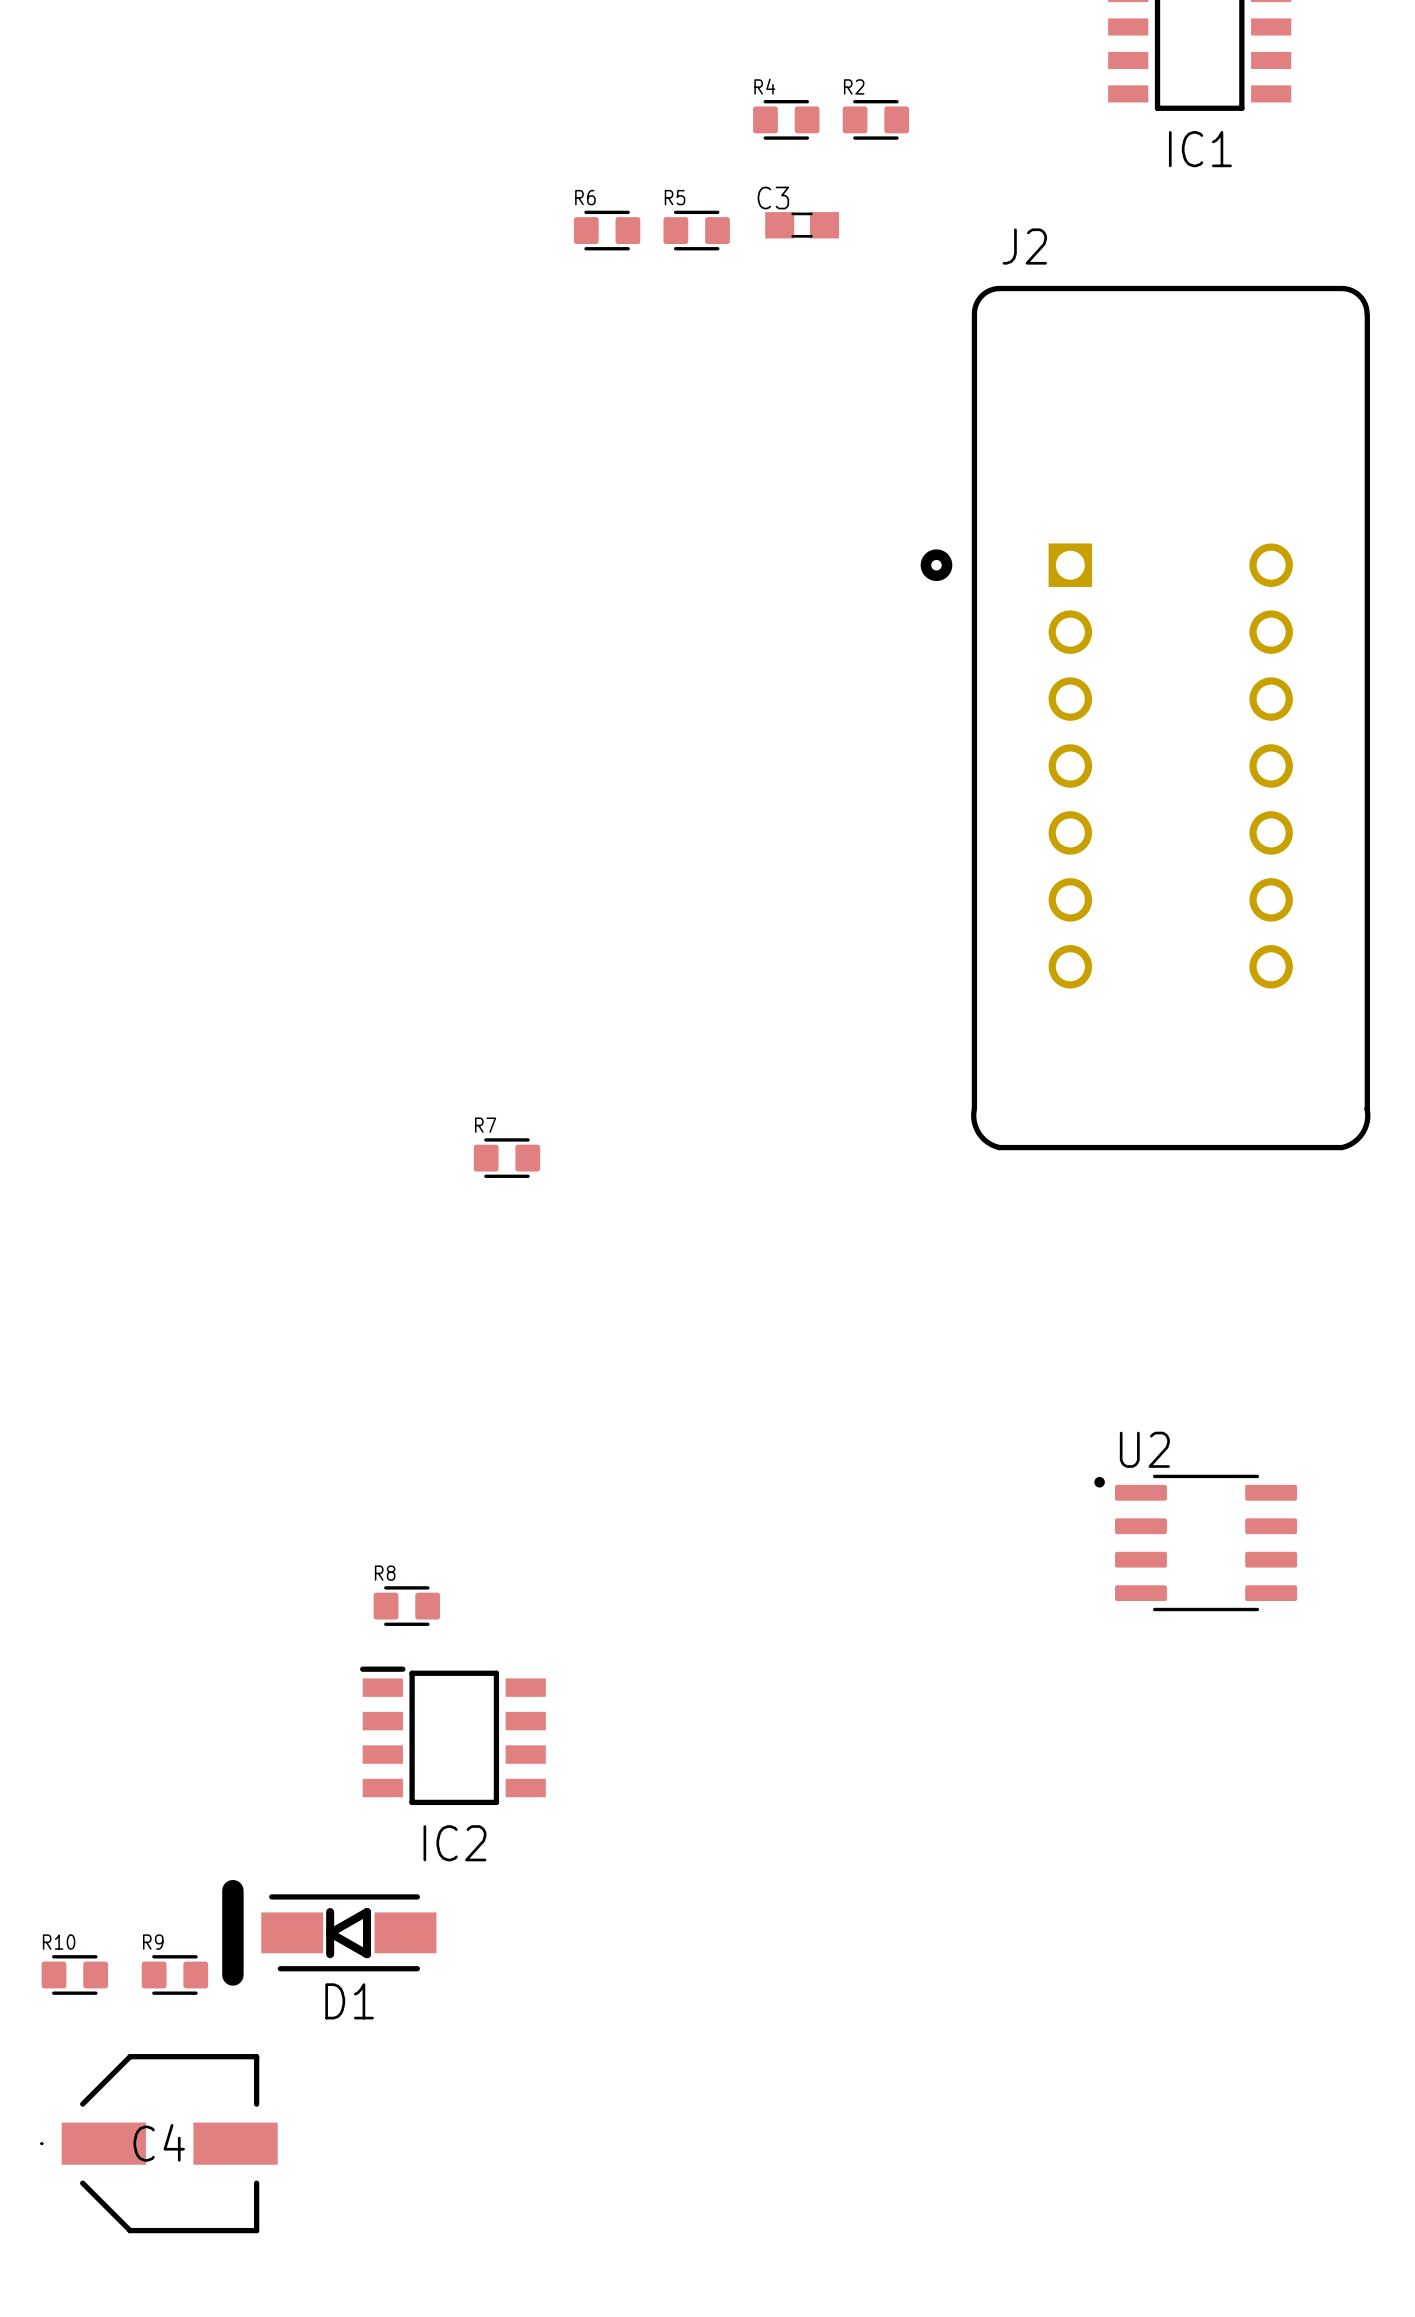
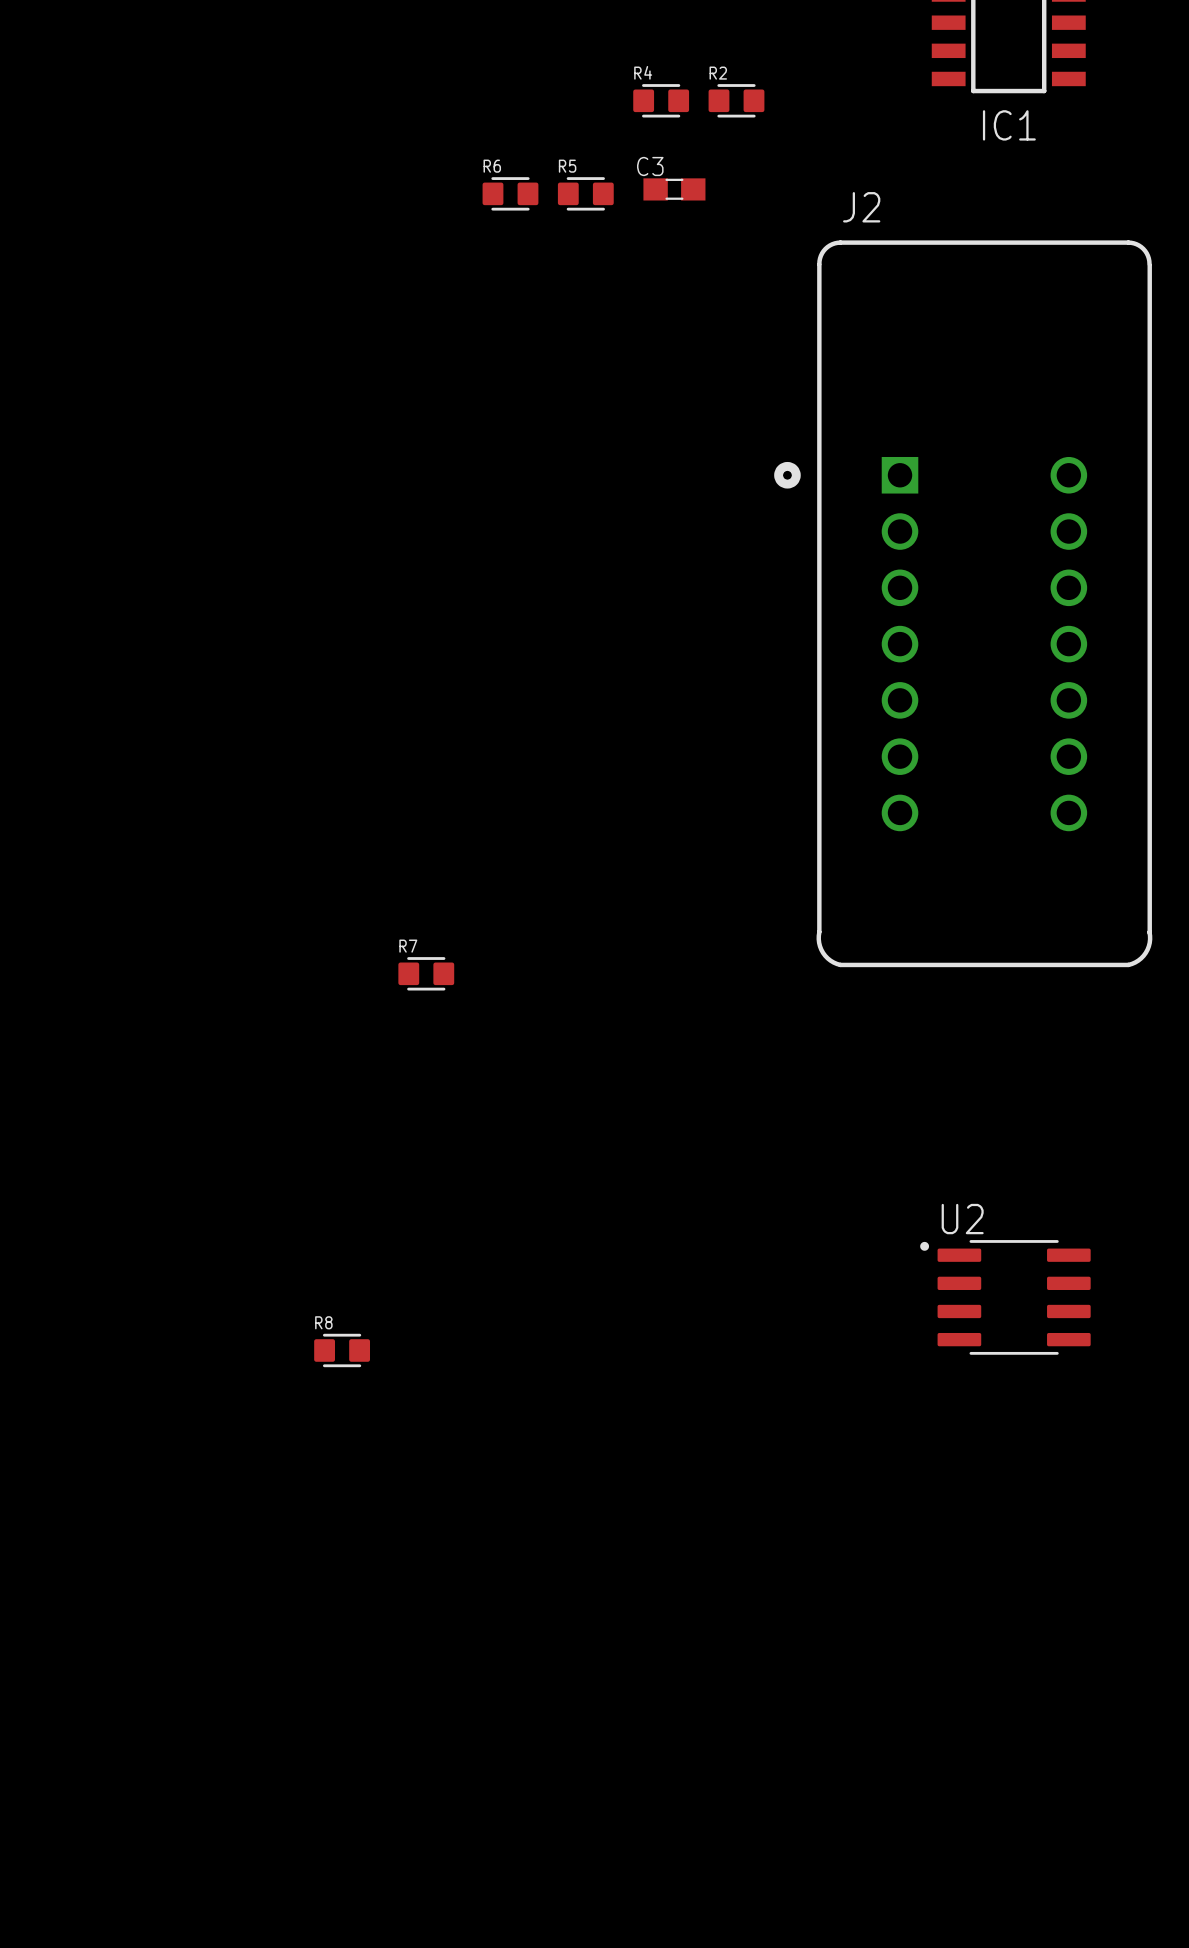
IC2: (452, 1735) -> none
D1: (329, 1932) -> none
R10: (74, 1974) -> none
R9: (174, 1974) -> none
C4: (159, 2143) -> none

